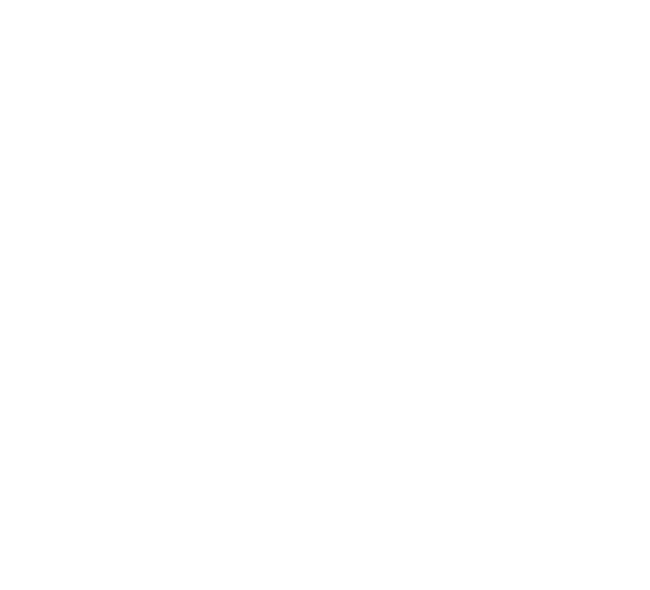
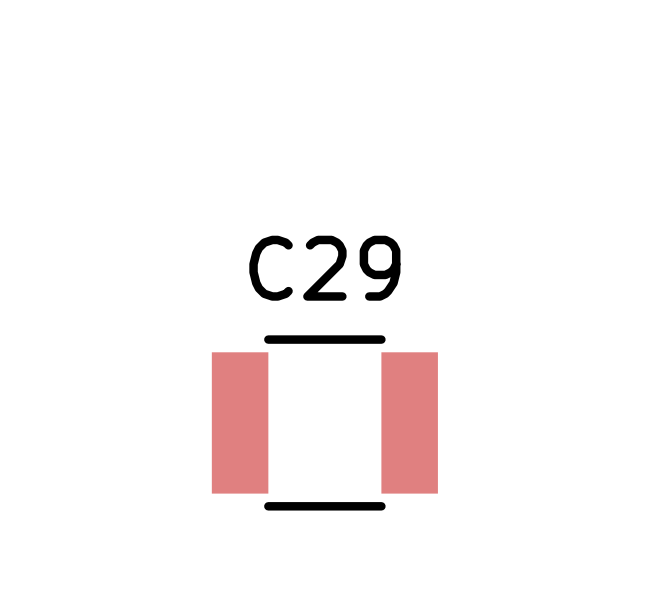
C29: none -> (324, 422)

